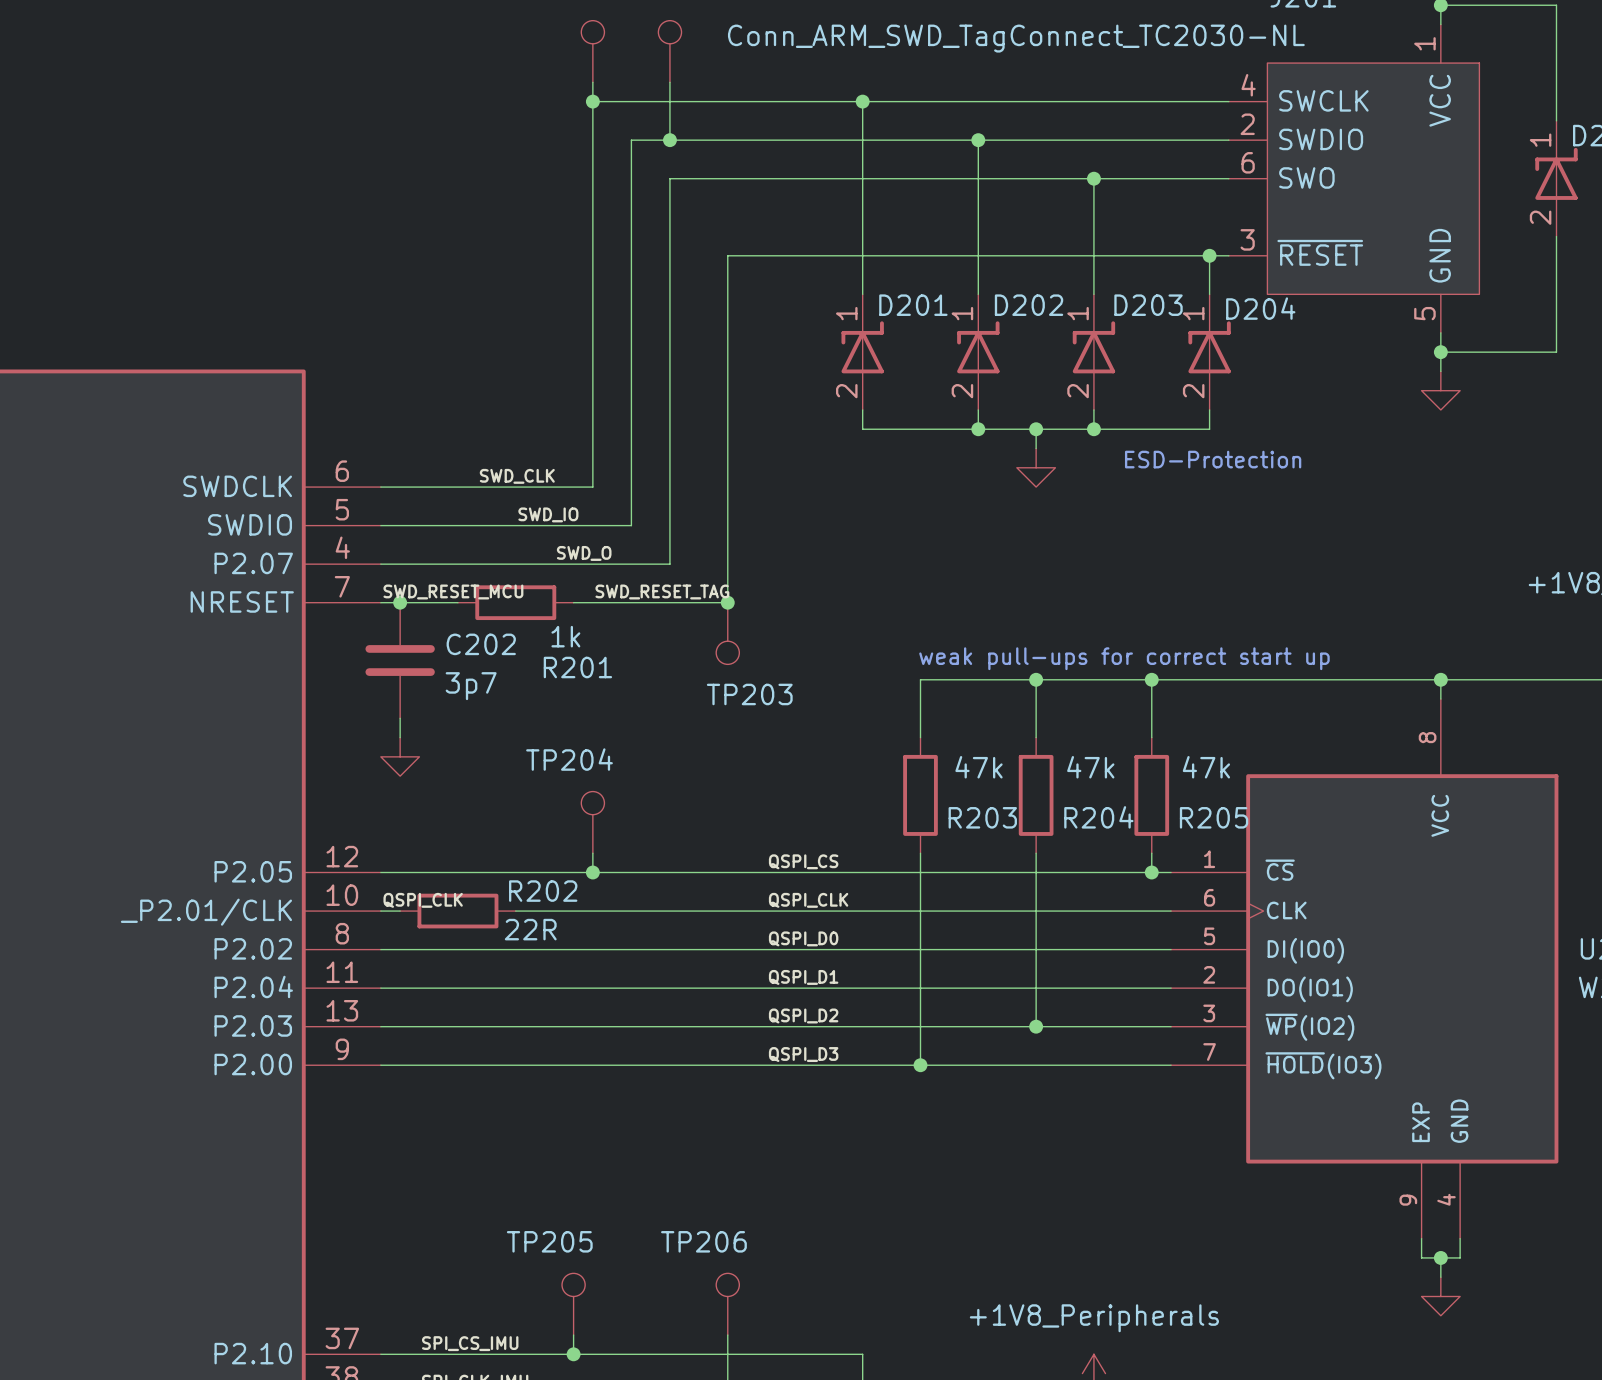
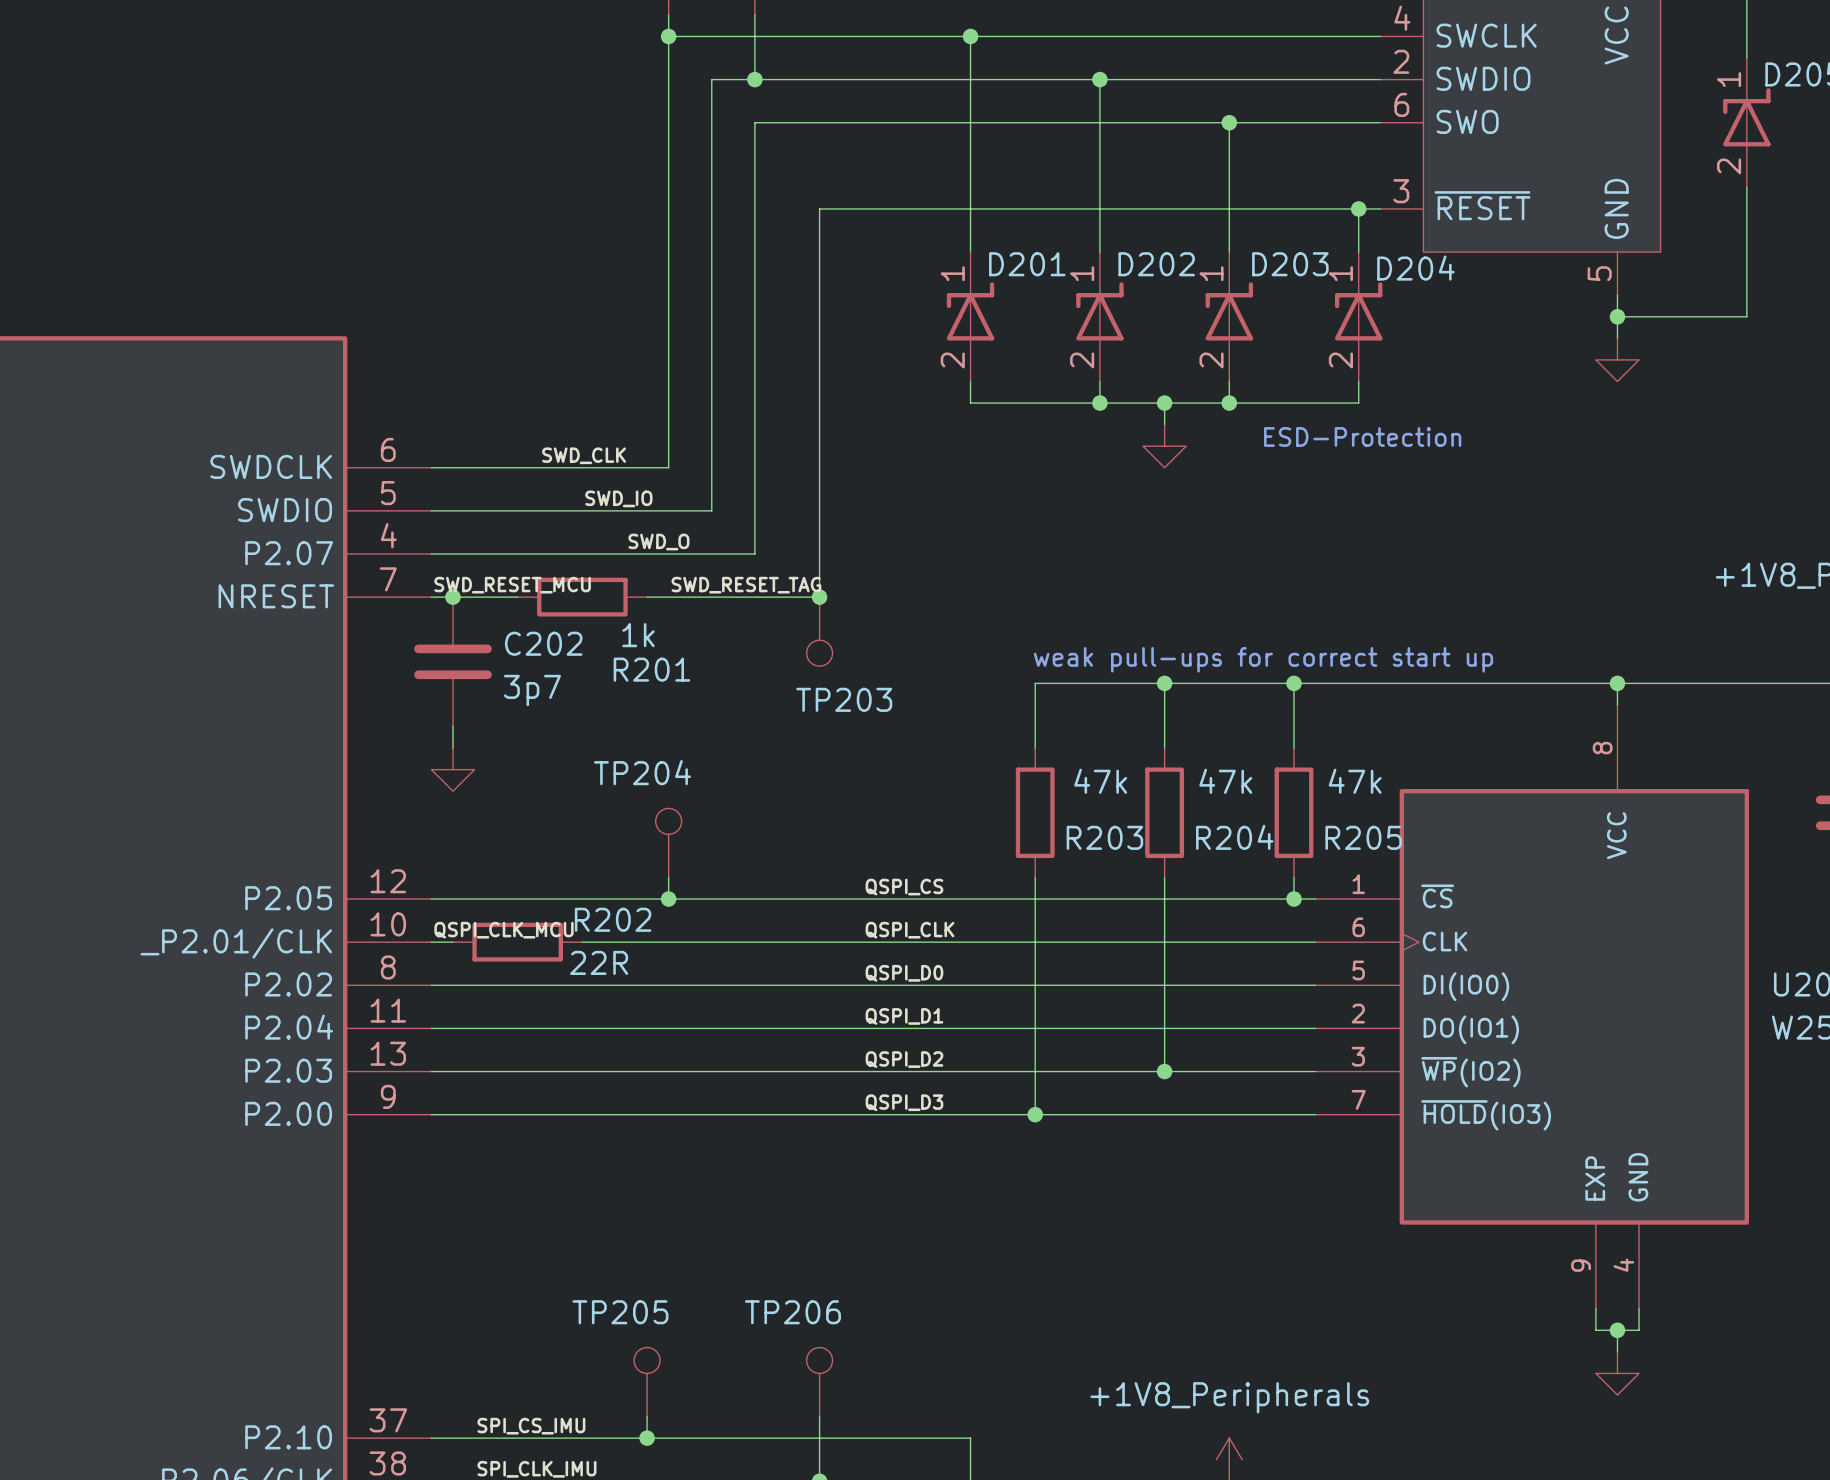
label: QSPI_CLK (423, 900) -> QSPI_CLK_MCU (503, 930)

